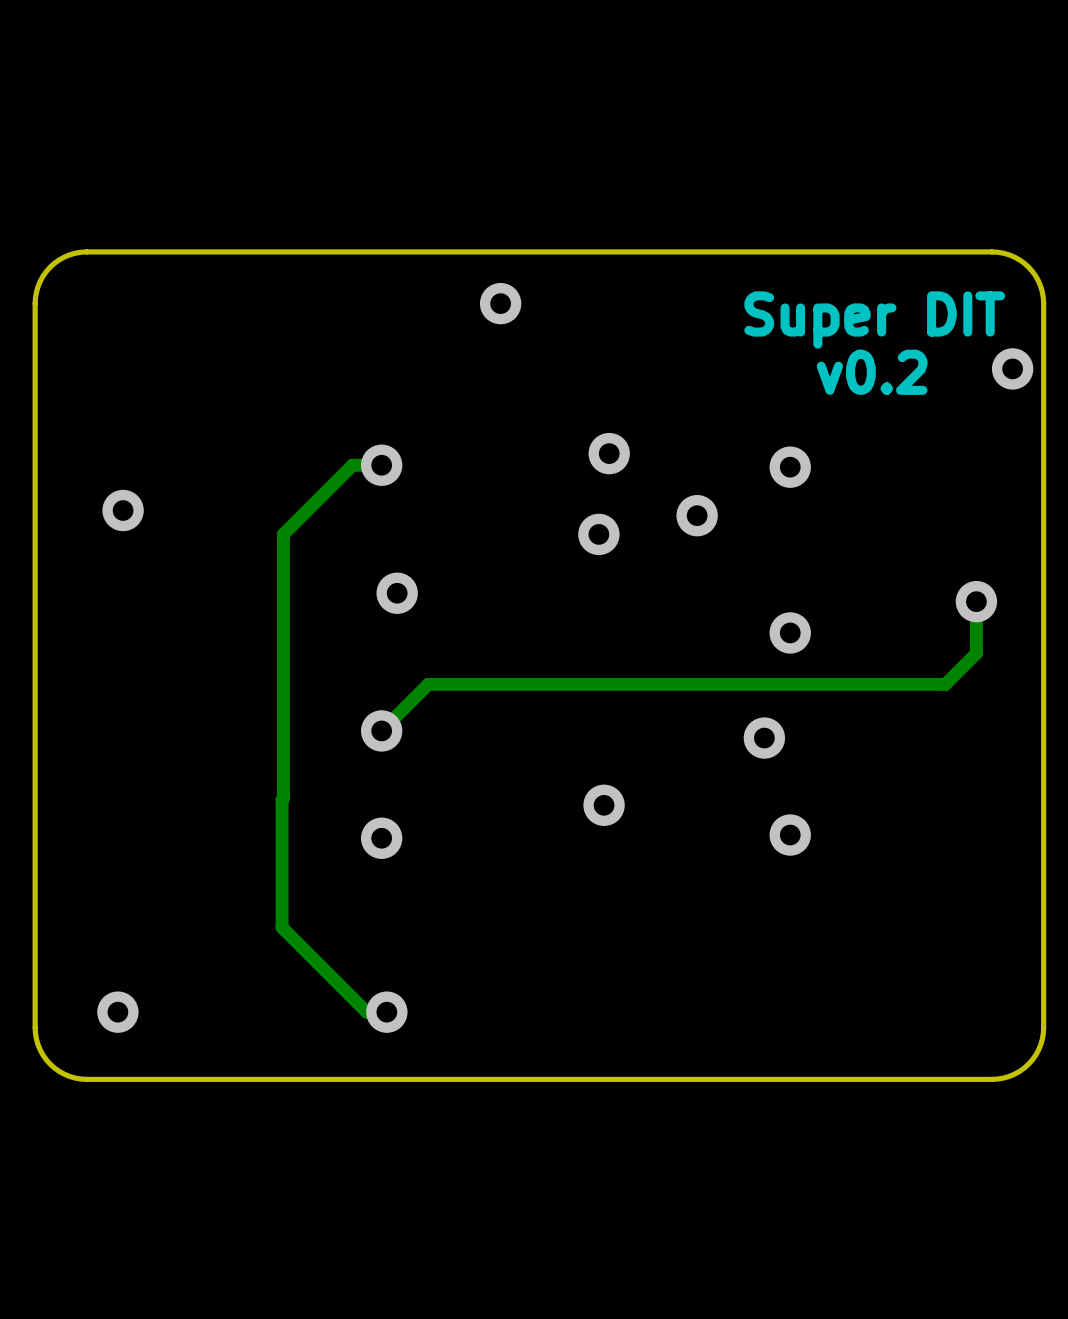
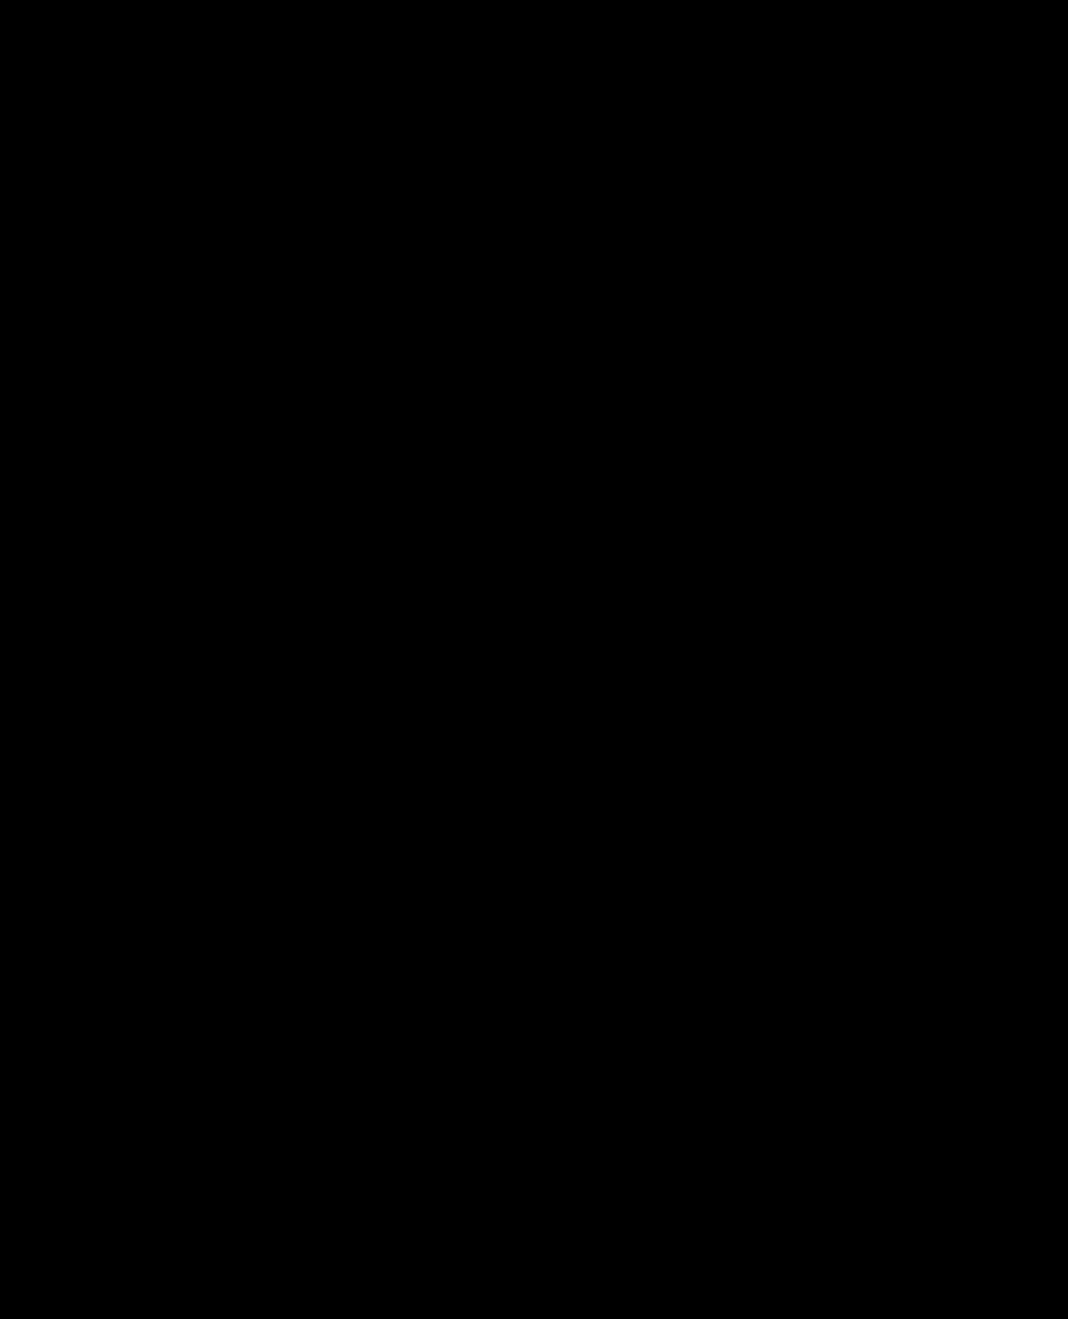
board edge: (991, 251) (86, 251) (69, 254) (54, 263) (40, 281) (35, 303) (35, 1027) (38, 1044) (46, 1059) (64, 1074) (86, 1079) (991, 1079) (1009, 1076) (1024, 1068) (1038, 1050) (1043, 1027) (1043, 303) (1038, 281) (1028, 267) (1009, 254) (991, 251) -> none
via: (500, 303) -> none
text: Super DIT (874, 320) -> none
via: (1012, 368) -> none
text: v0.2 (872, 372) -> none
via: (609, 453) -> none
track: (381, 465) (352, 465) (283, 534) (282, 927) (366, 1012) (386, 1012) -> none
via: (381, 465) -> none
via: (790, 467) -> none
via: (123, 510) -> none
via: (697, 515) -> none
via: (598, 534) -> none
via: (397, 593) -> none
track: (976, 601) (976, 653) (945, 684) (428, 684) (381, 730) -> none
via: (976, 601) -> none
via: (790, 632) -> none
via: (381, 730) -> none
via: (764, 738) -> none
via: (604, 805) -> none
via: (790, 835) -> none
via: (381, 838) -> none
via: (117, 1012) -> none
via: (386, 1012) -> none

